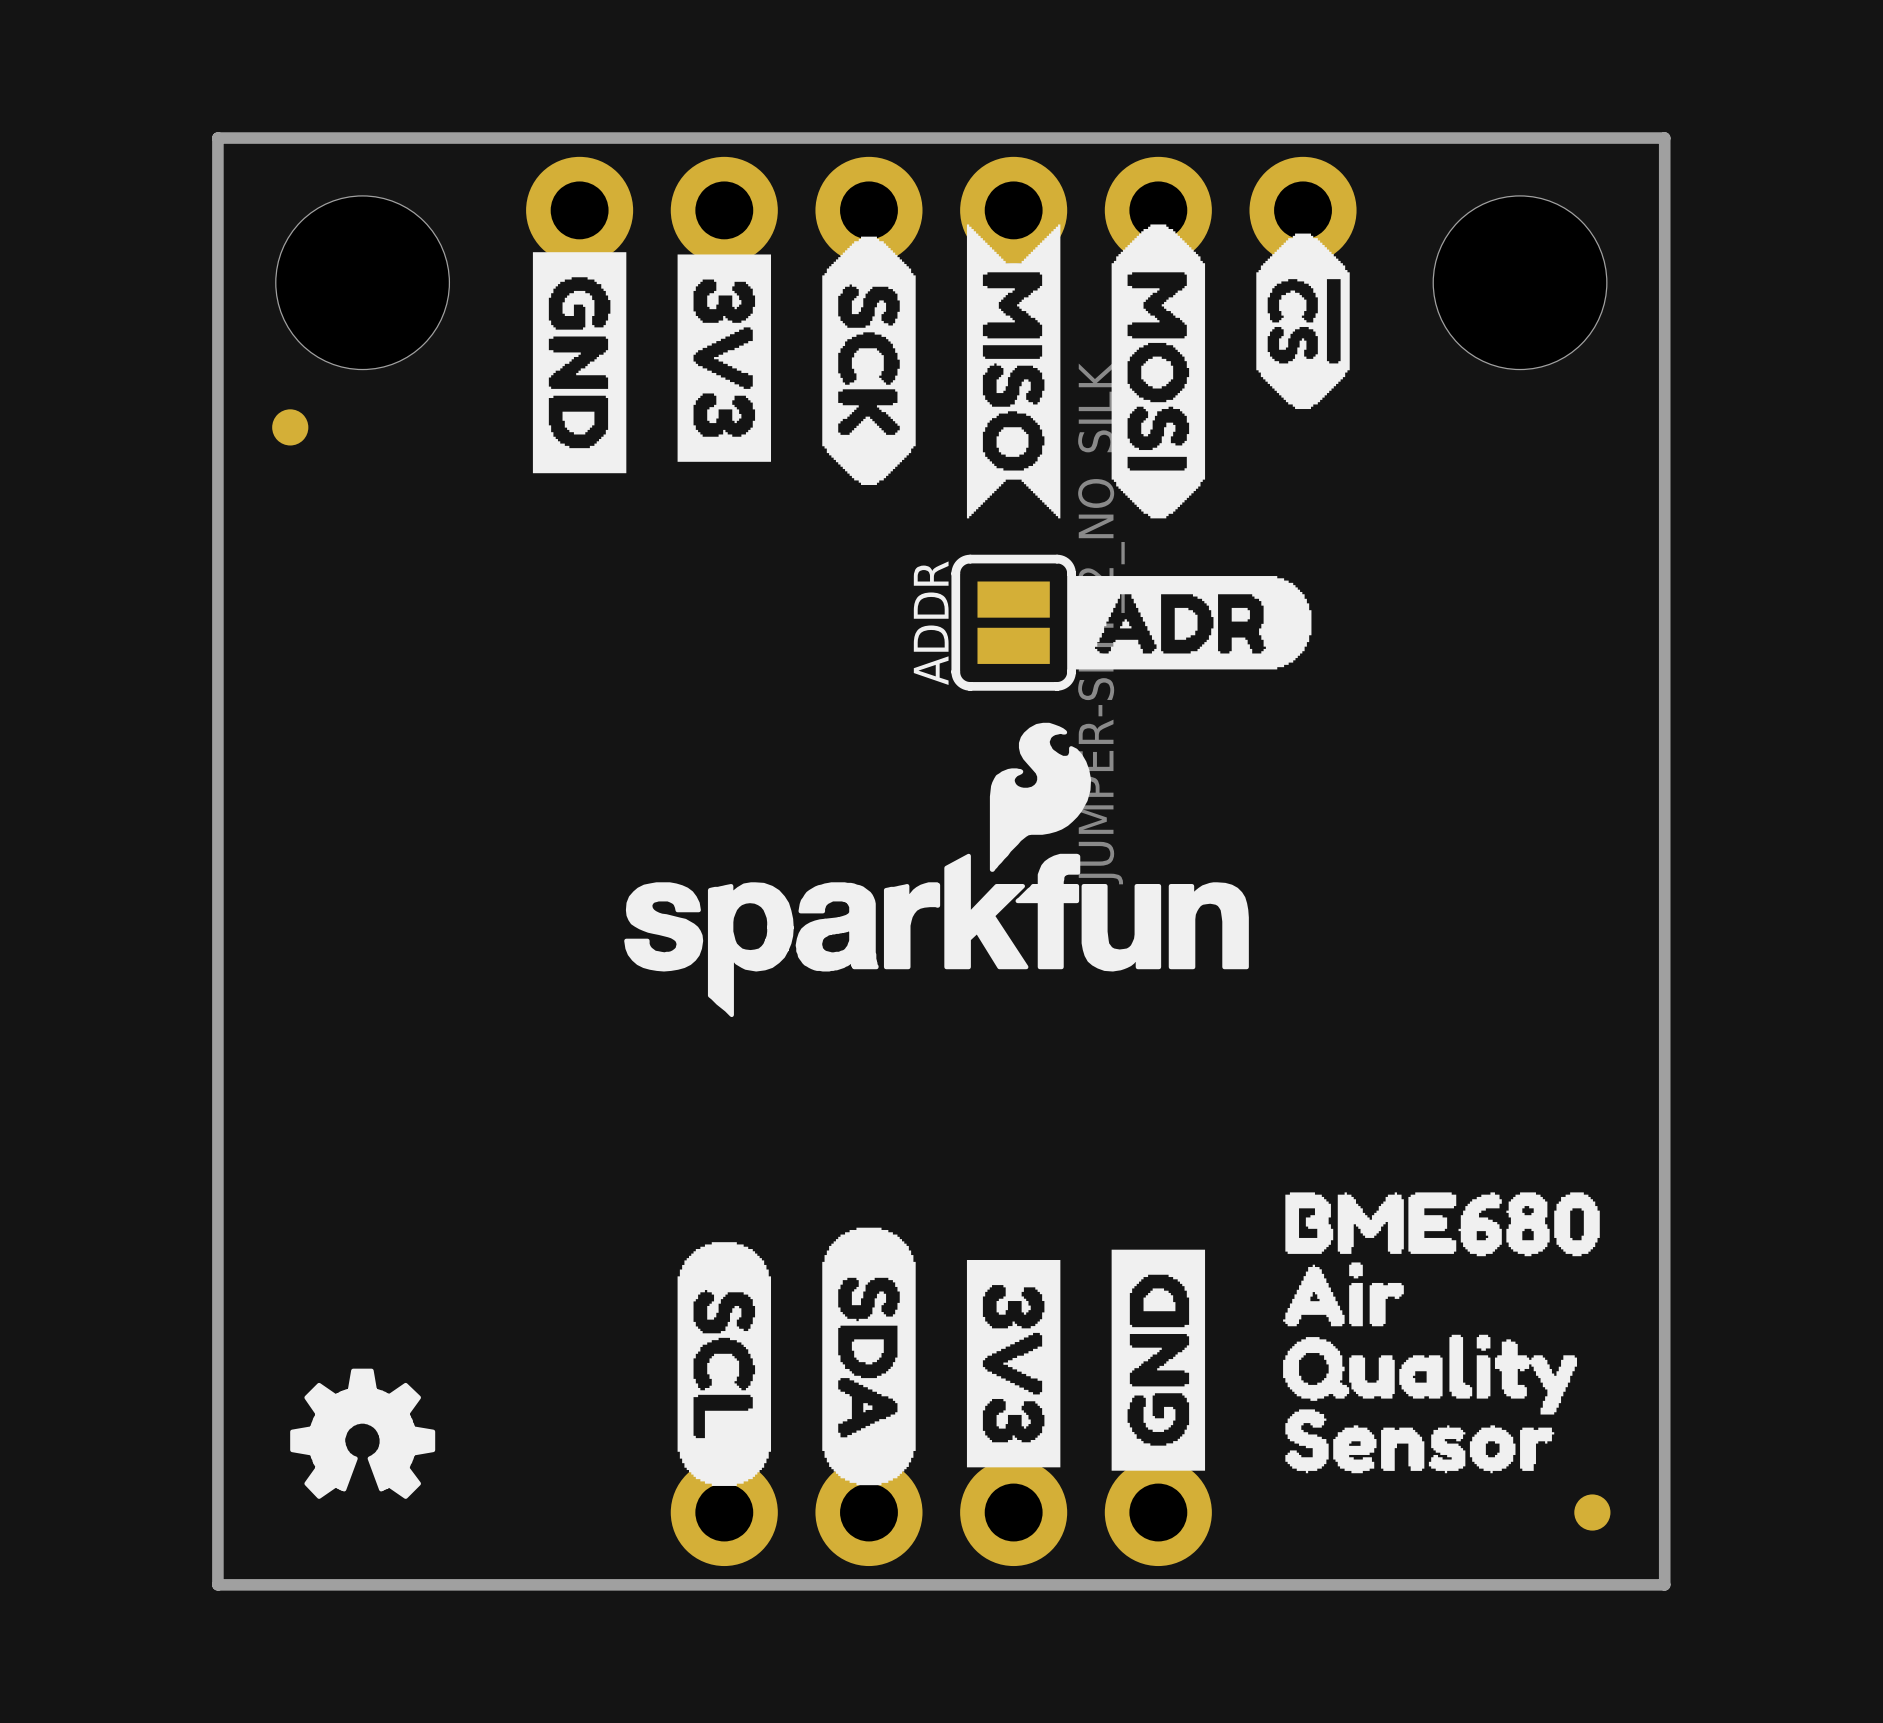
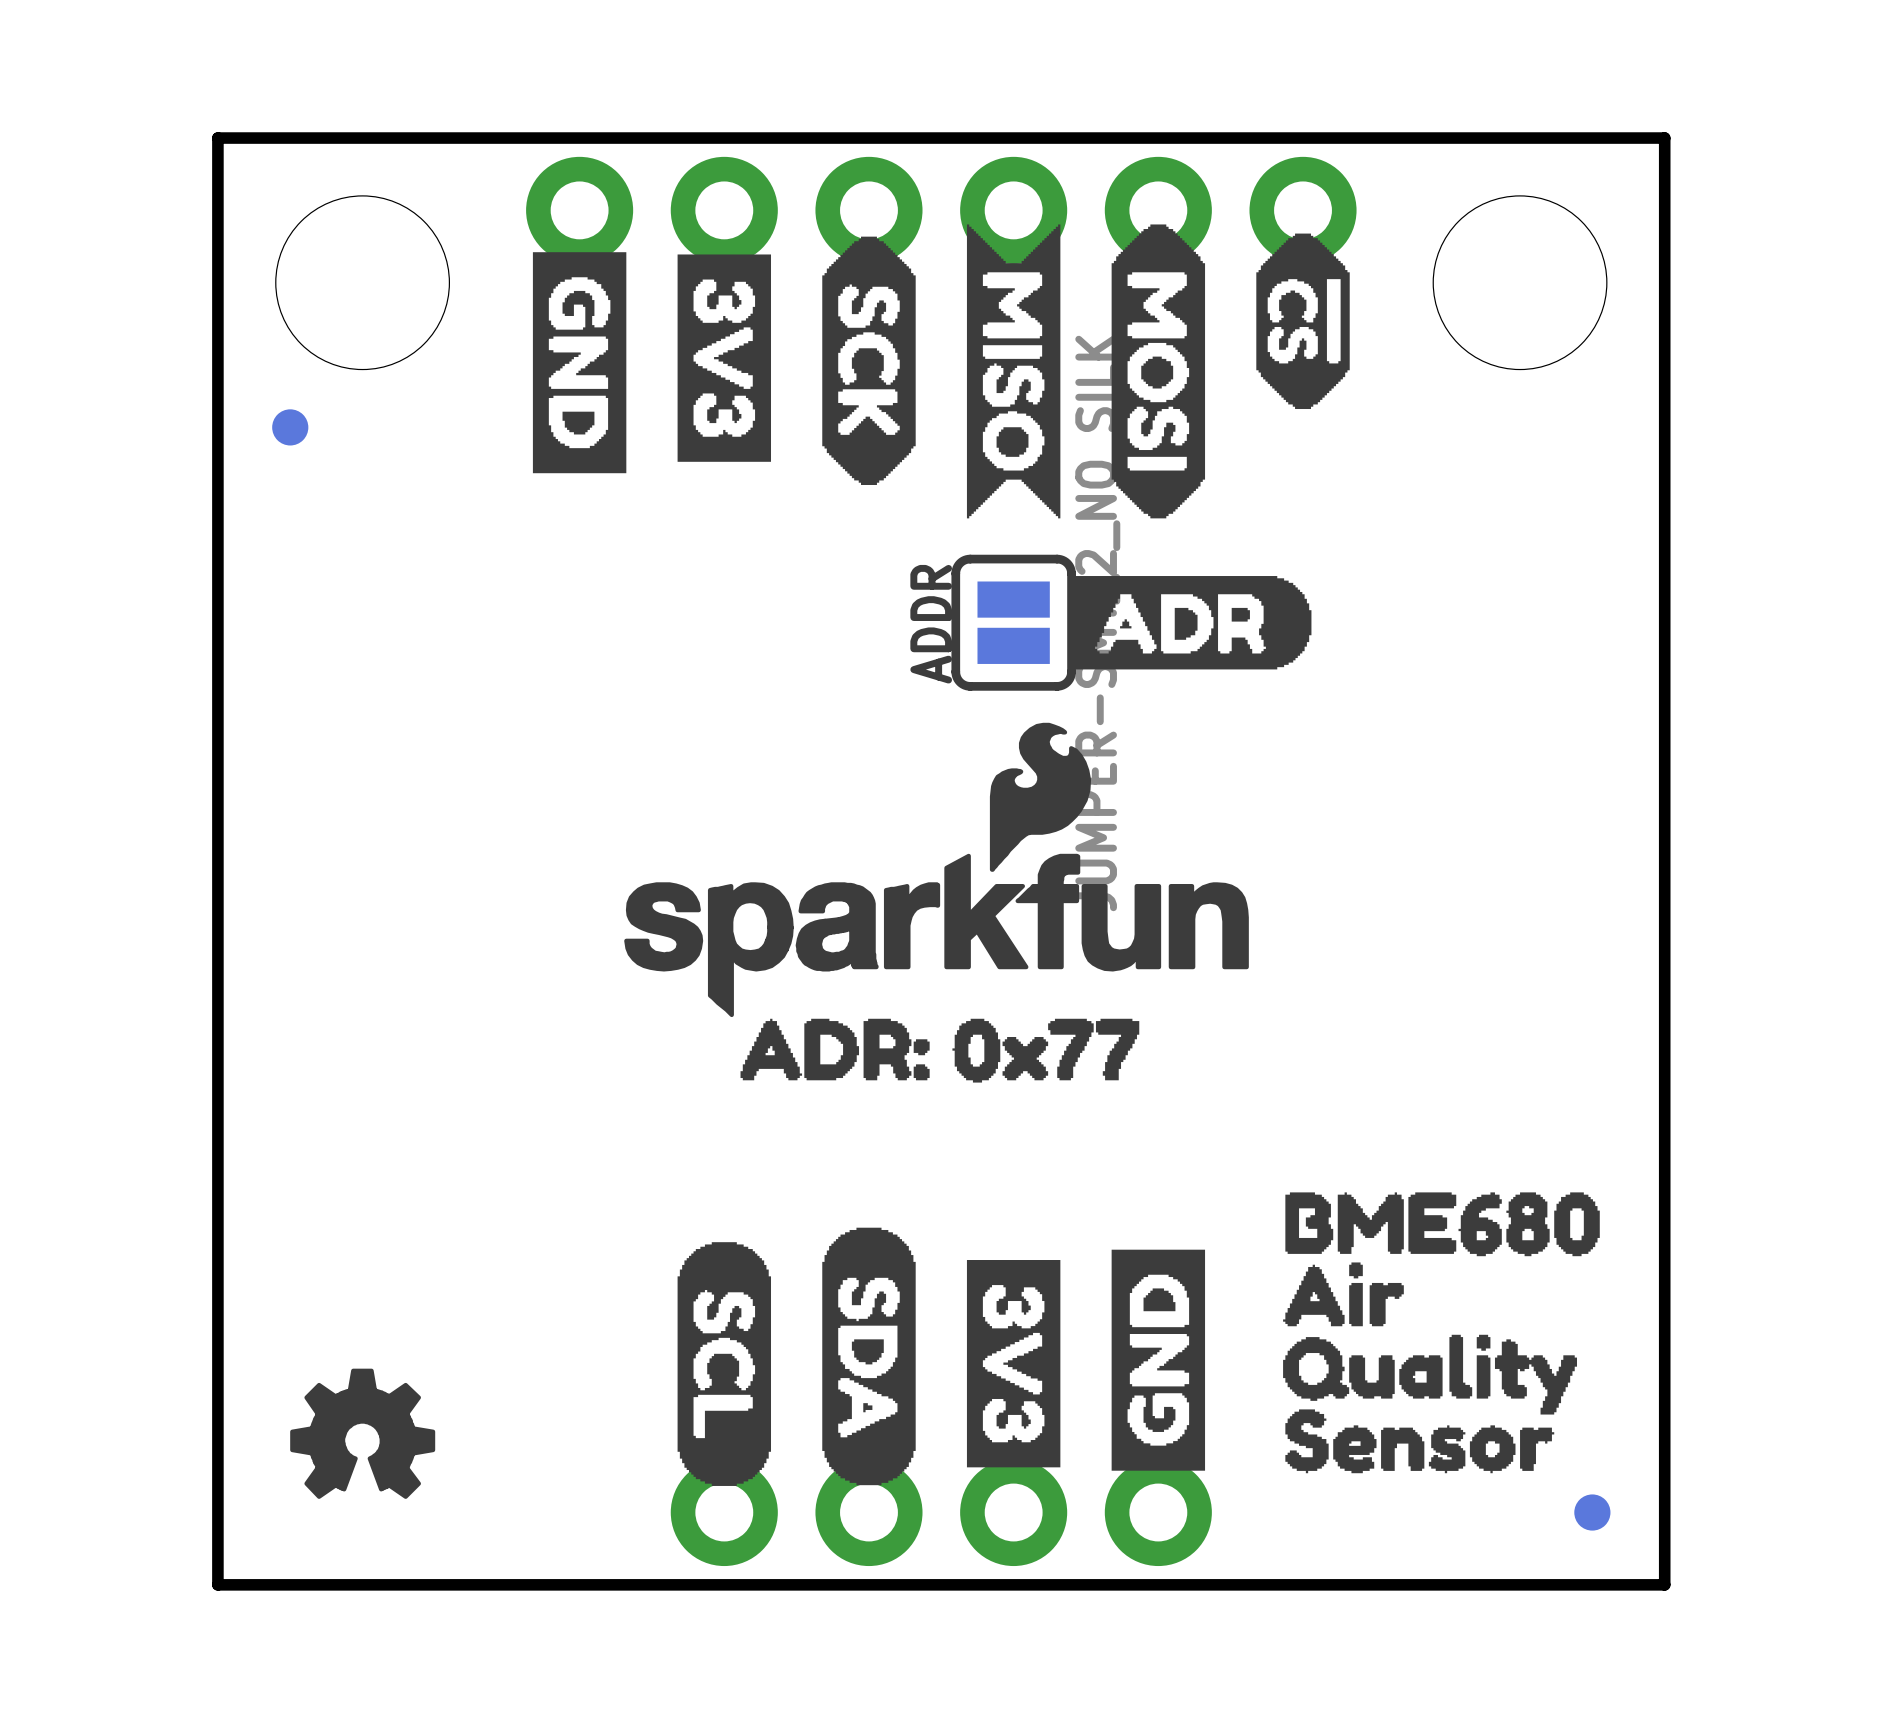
drawing: none -> [740, 1018, 1140, 1083]

